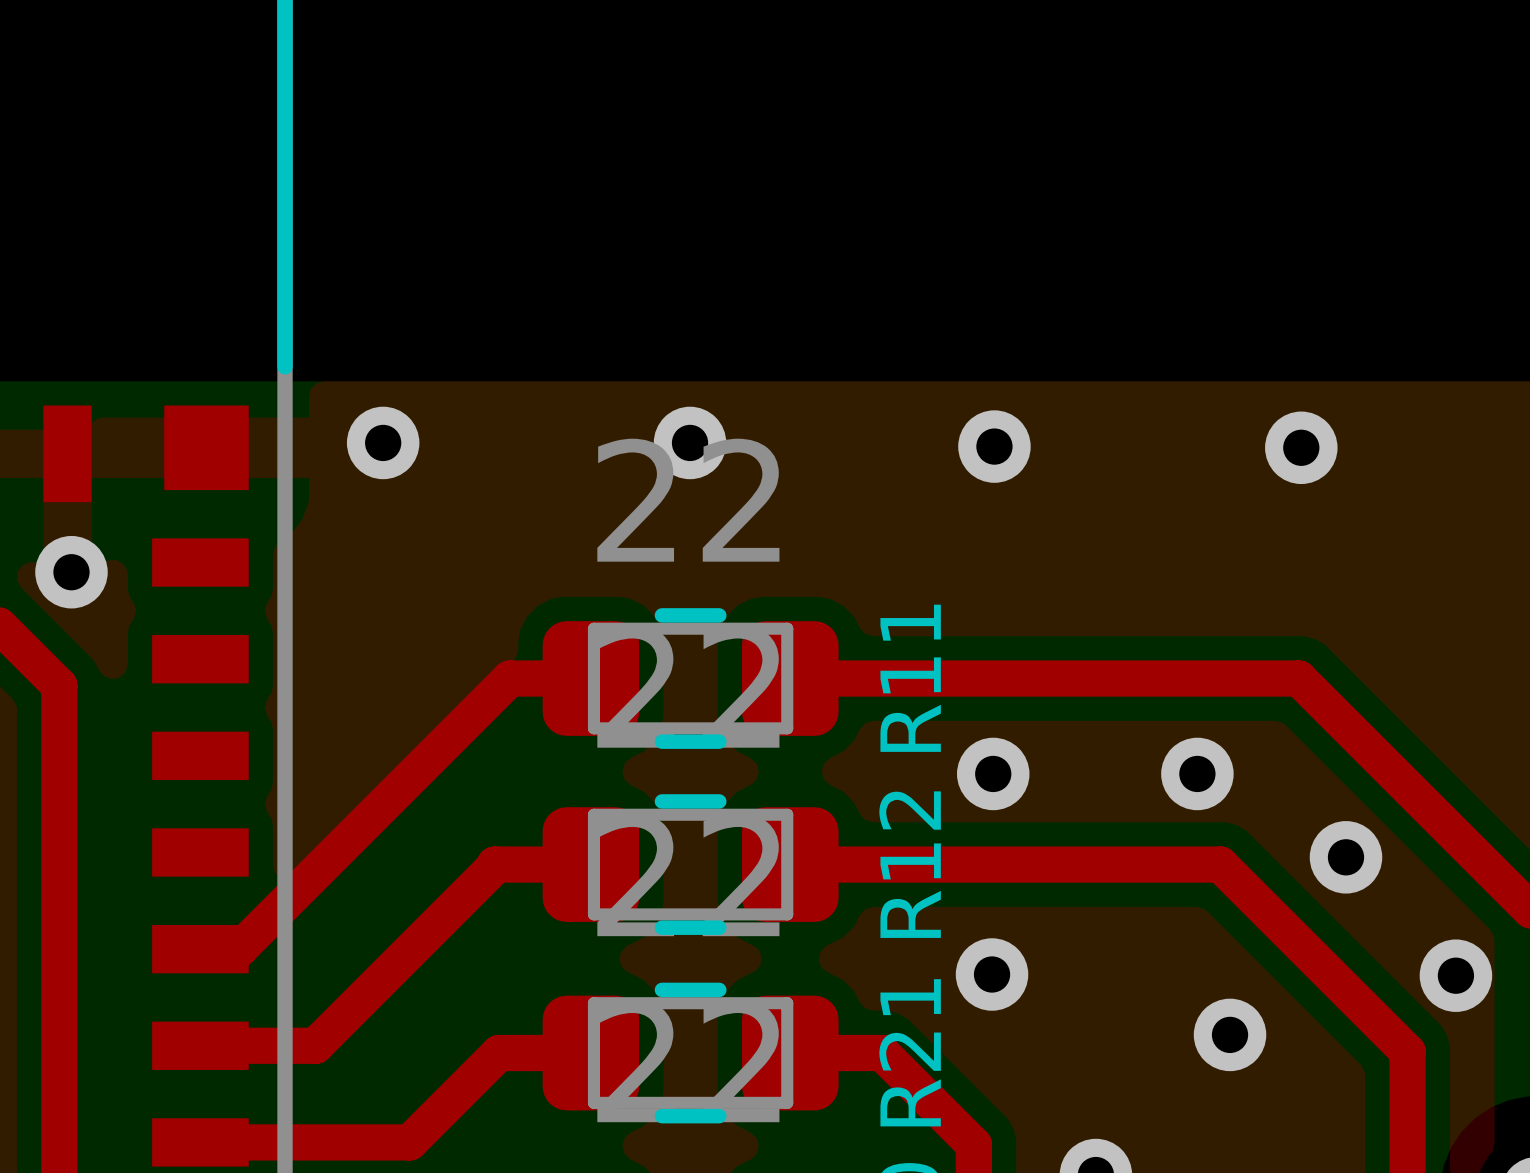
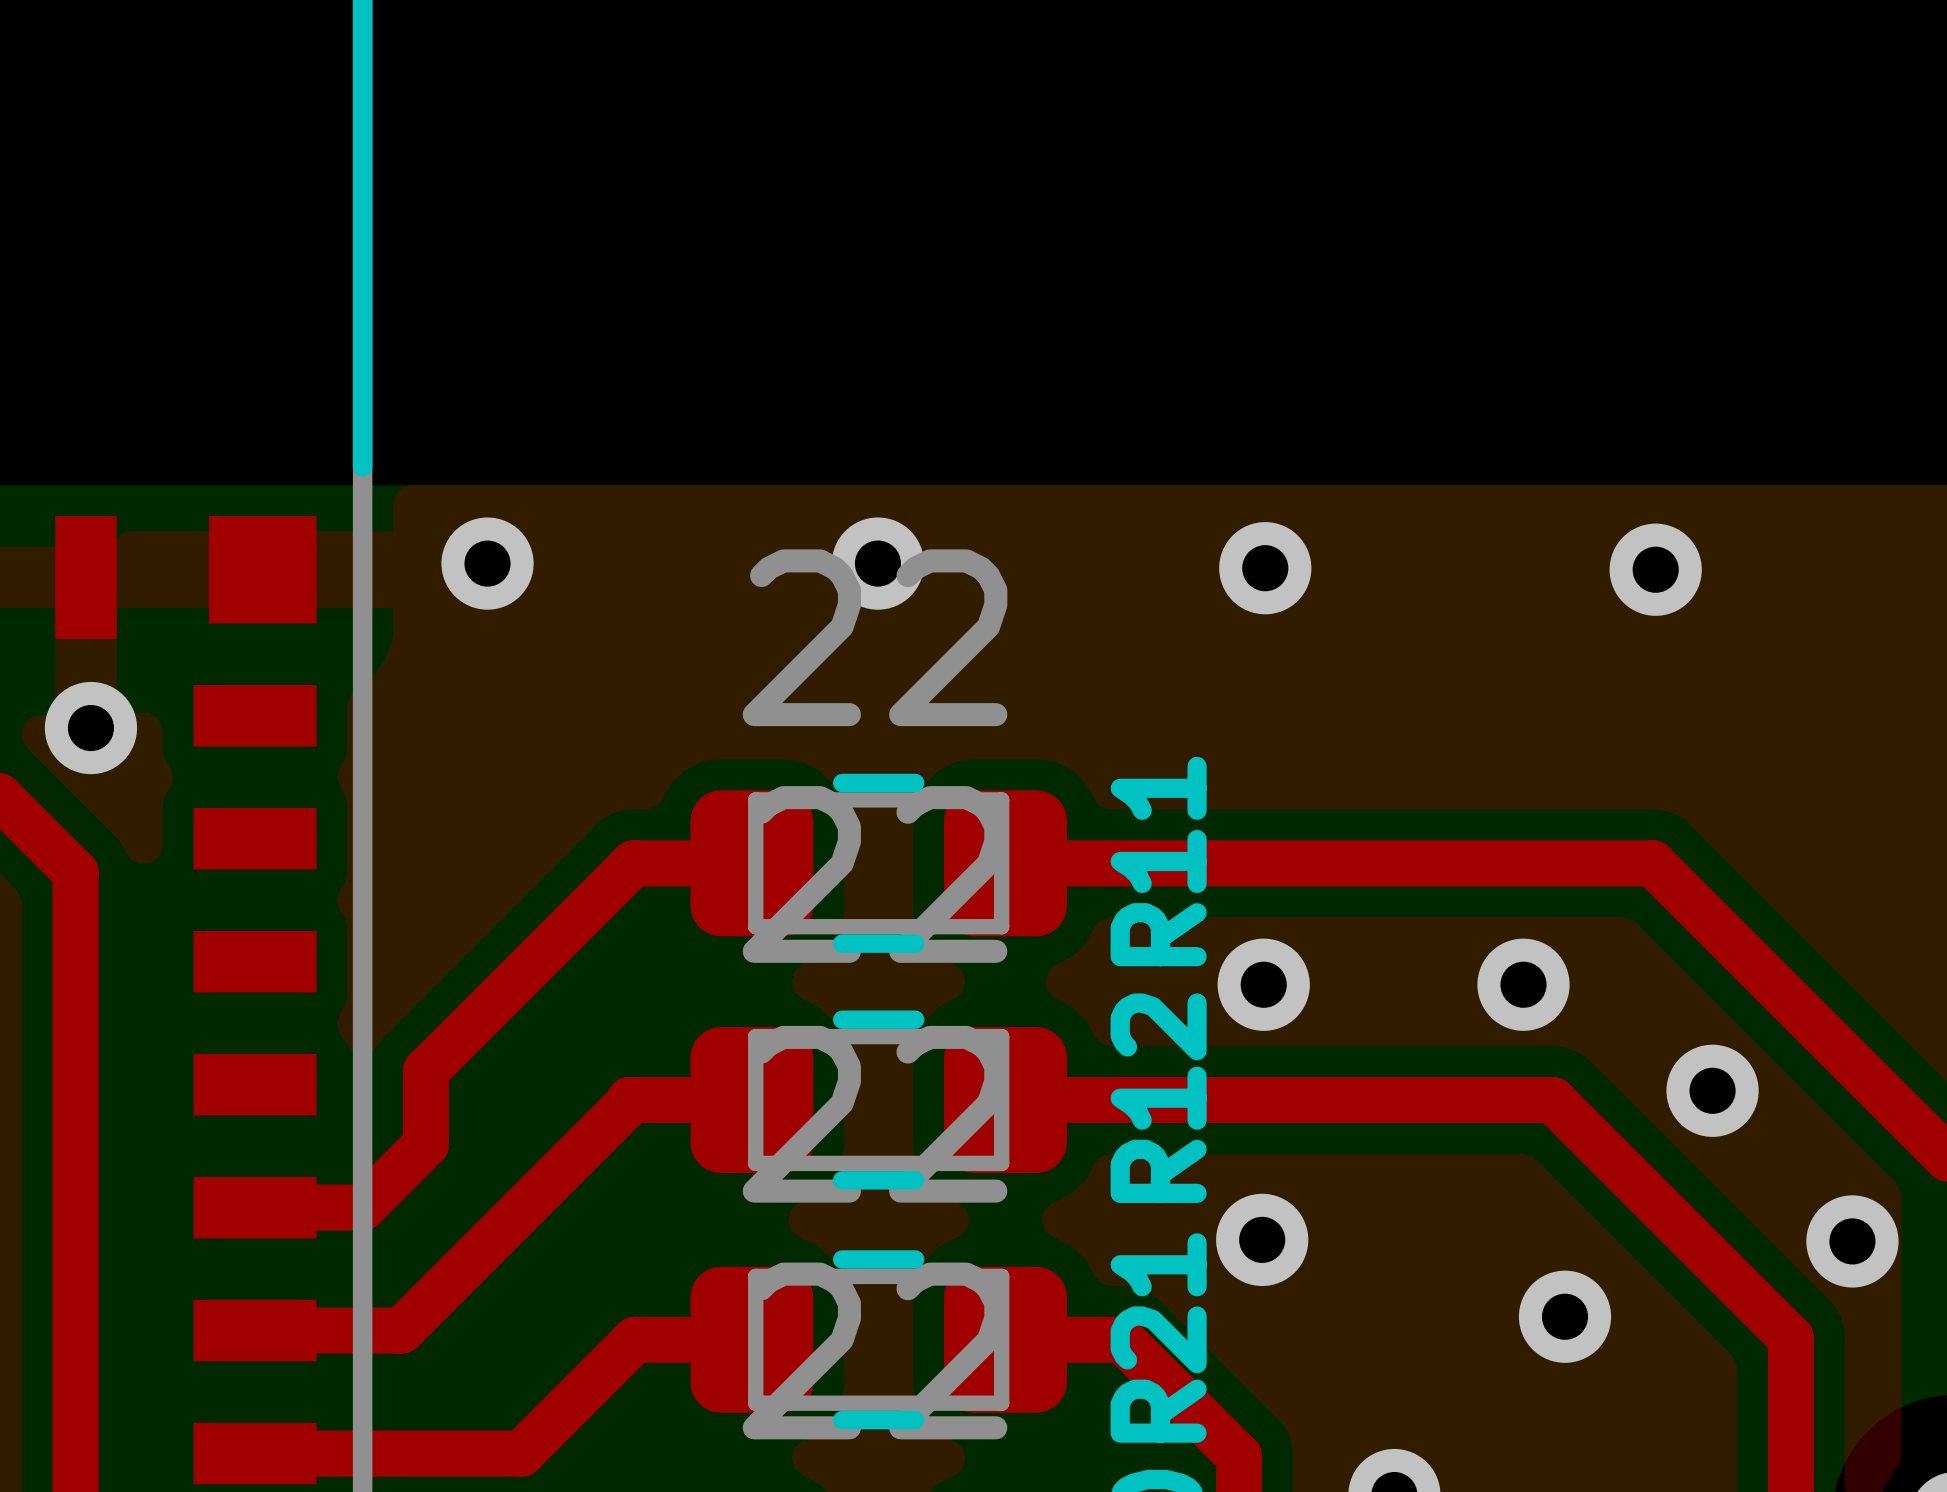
top track: (510, 678) (239, 949) -> (648, 863) (633, 863) (426, 1070) (426, 1144) (362, 1207) (304, 1207)

